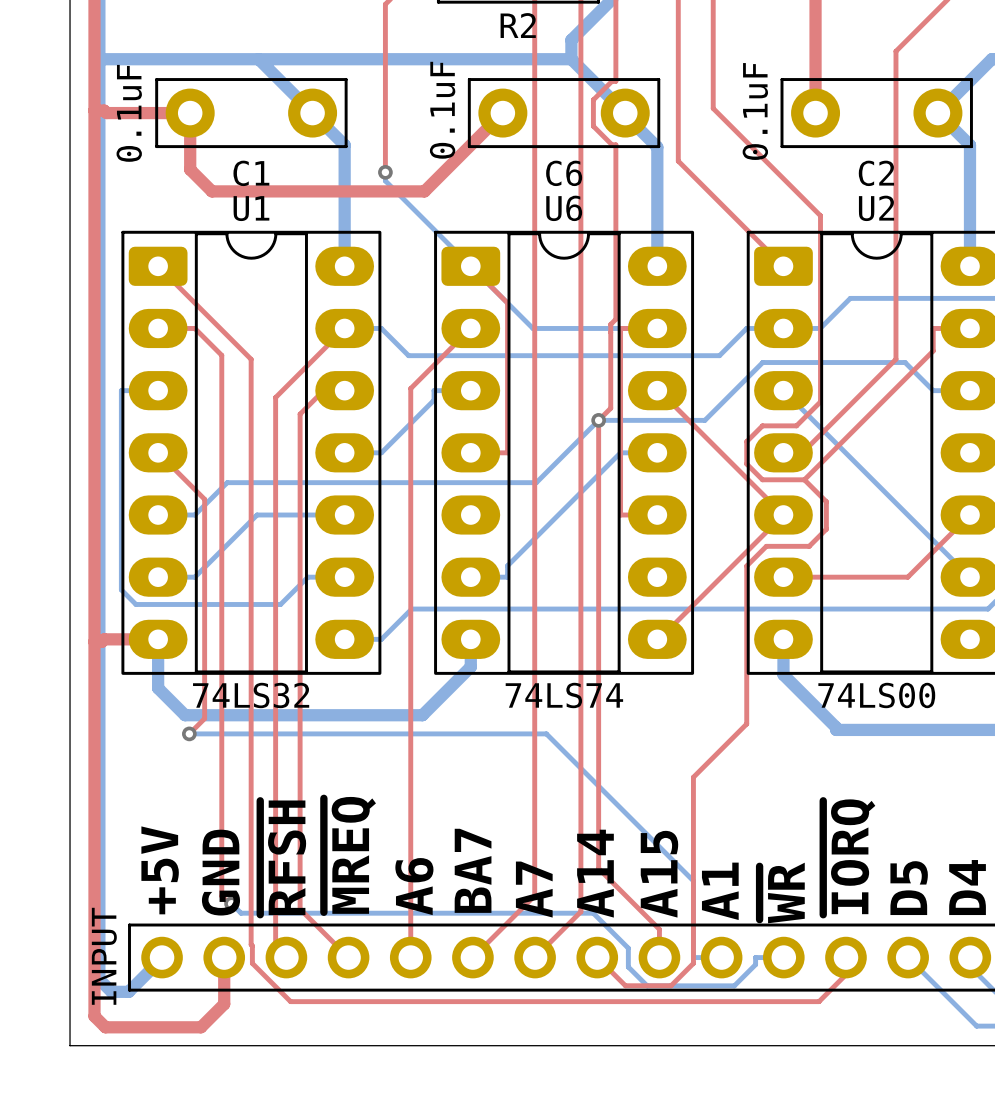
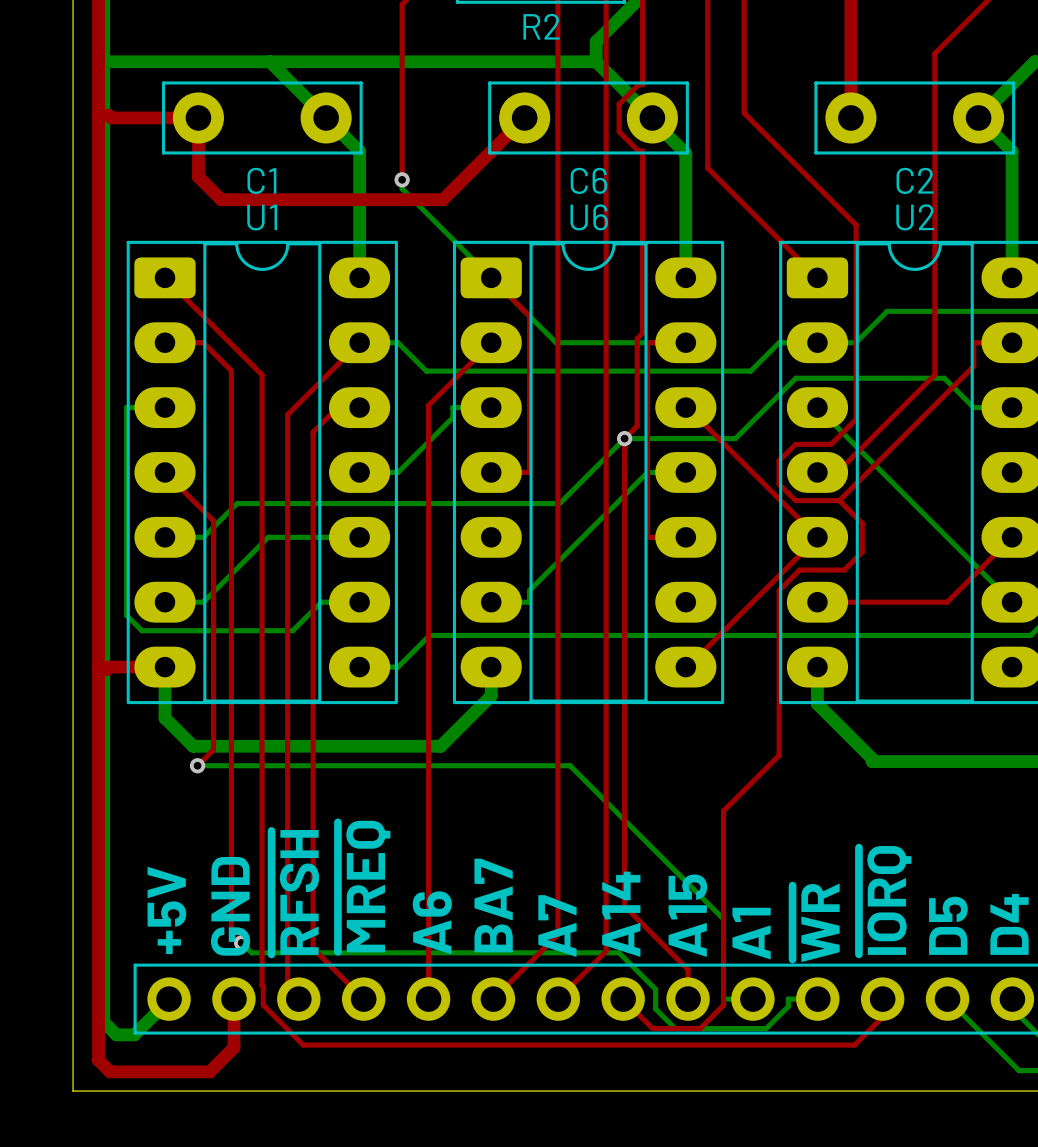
C6 value: 0.1uF (442, 110) -> none
C2 value: 0.1uF (755, 111) -> none
C1 value: 0.1uF (129, 113) -> none
U1 value: 74LS32 (251, 695) -> none
U6 value: 74LS74 (564, 695) -> none
U2 value: 74LS00 (876, 695) -> none
part value: INPUT (104, 956) -> none

